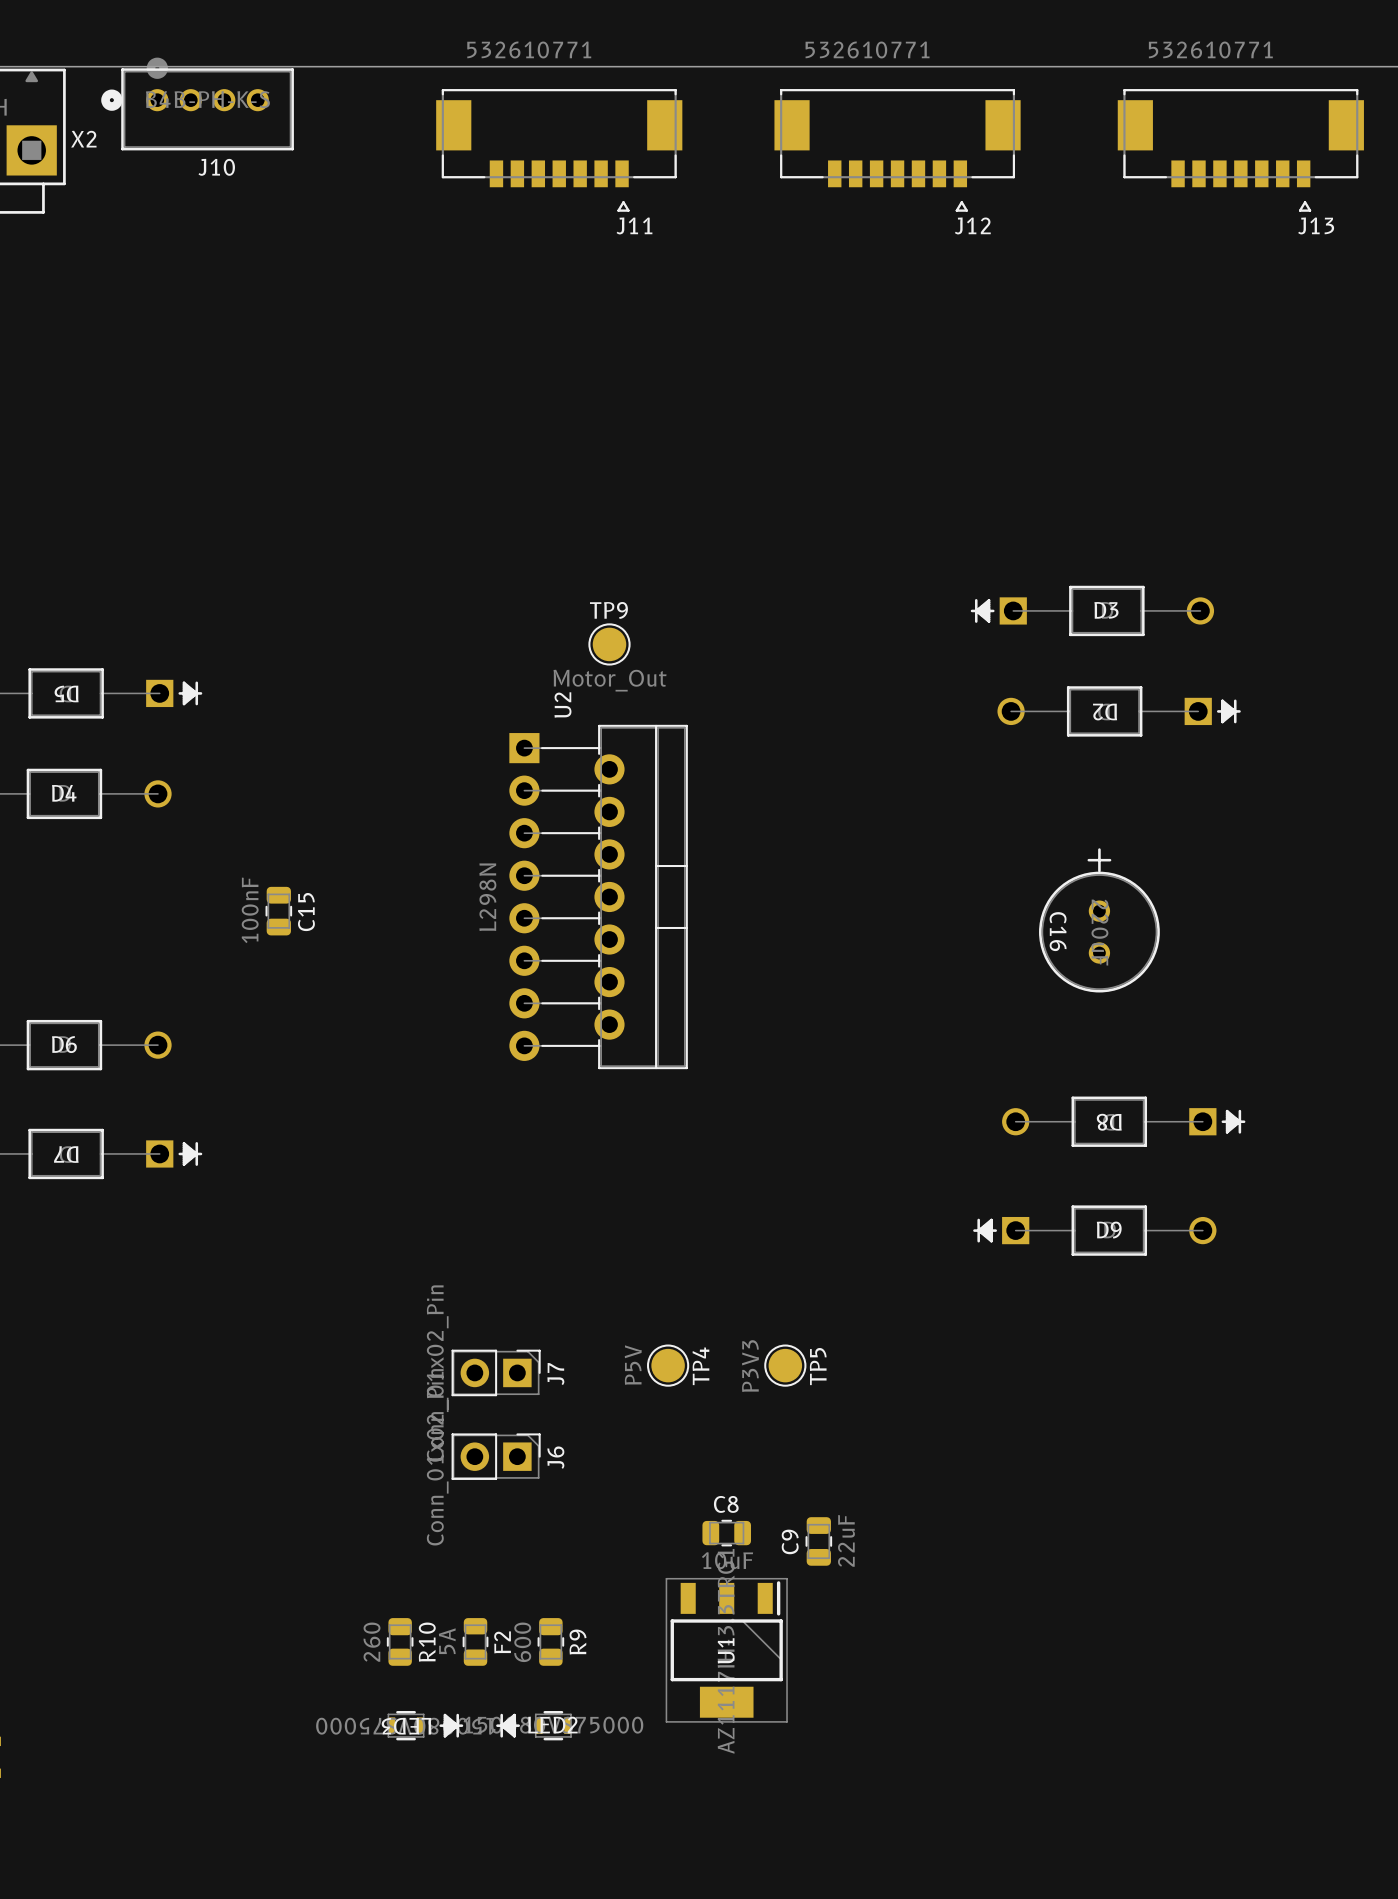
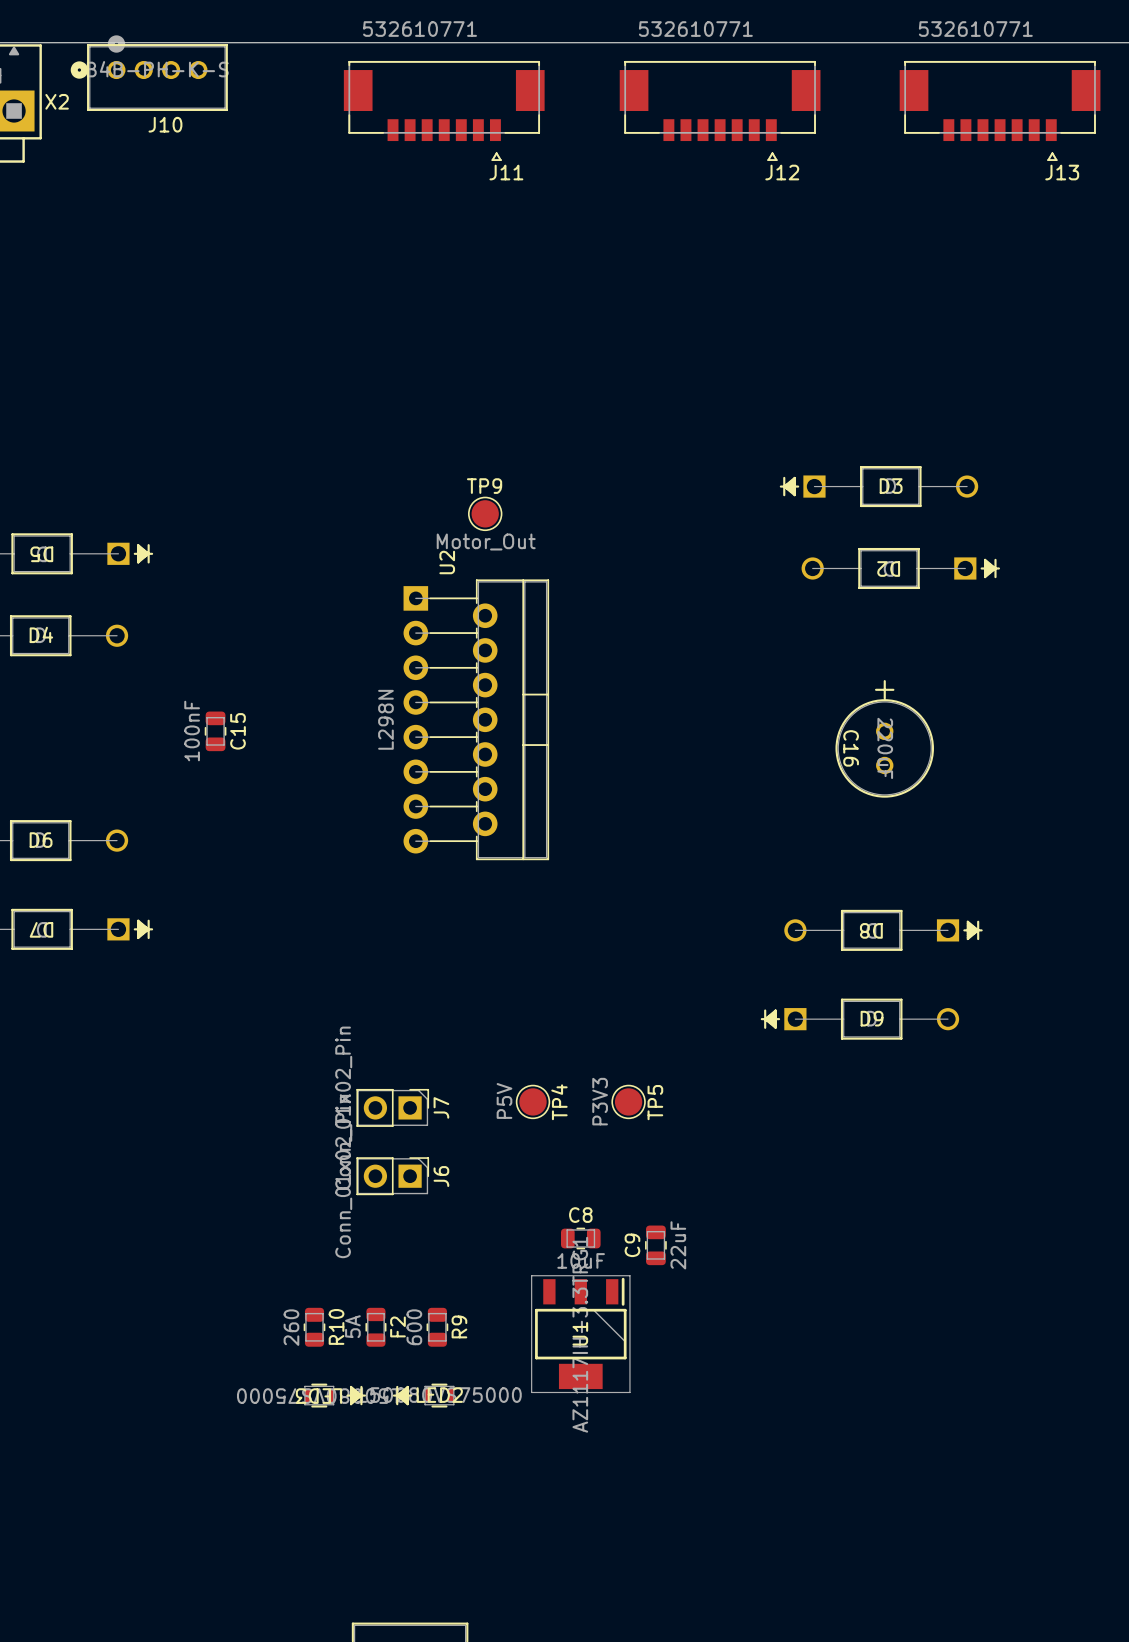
D8 position: (1123, 1121) -> (883, 930)
D9 position: (1094, 1230) -> (859, 1019)

